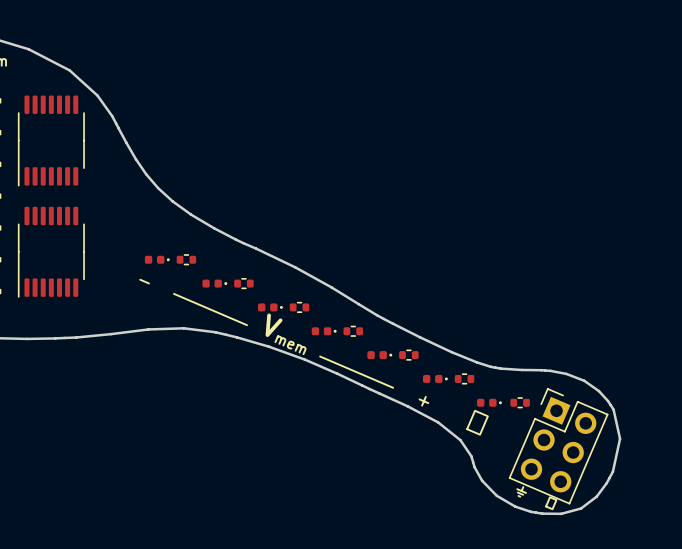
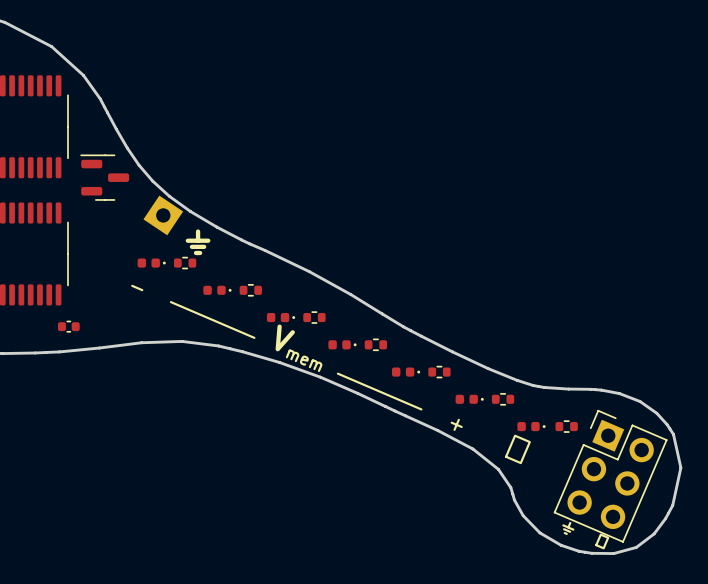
part: none -> (104, 177)
part: none -> (163, 215)
text: none -> ⏚ (198, 242)
part: none -> (68, 326)

